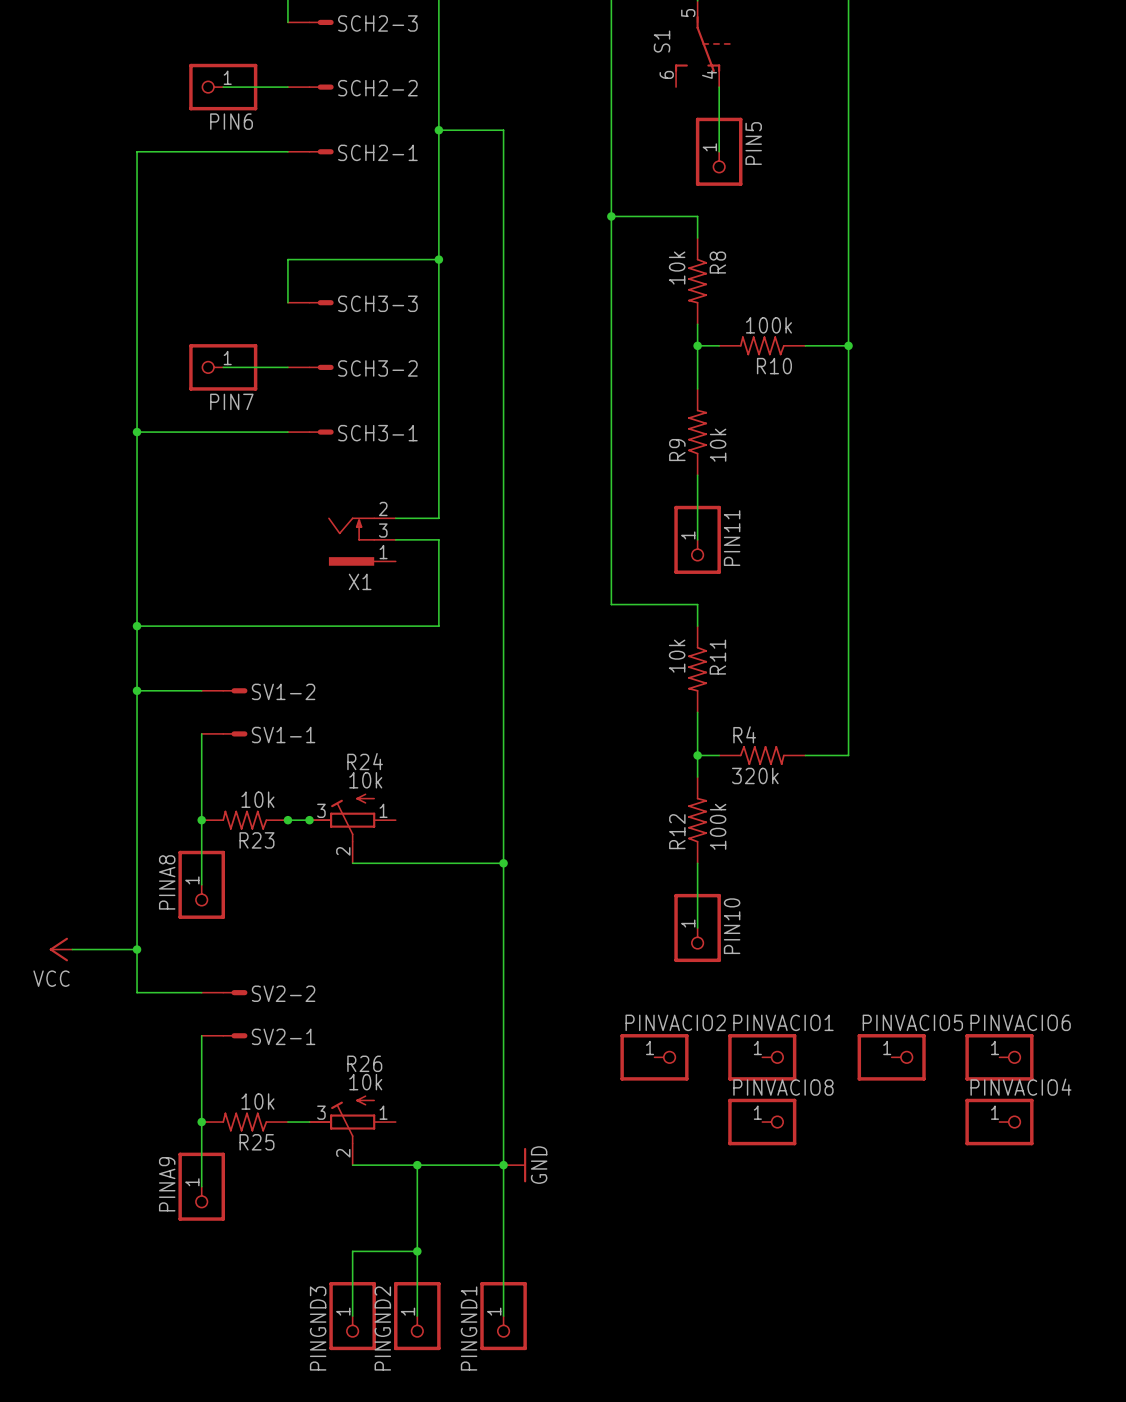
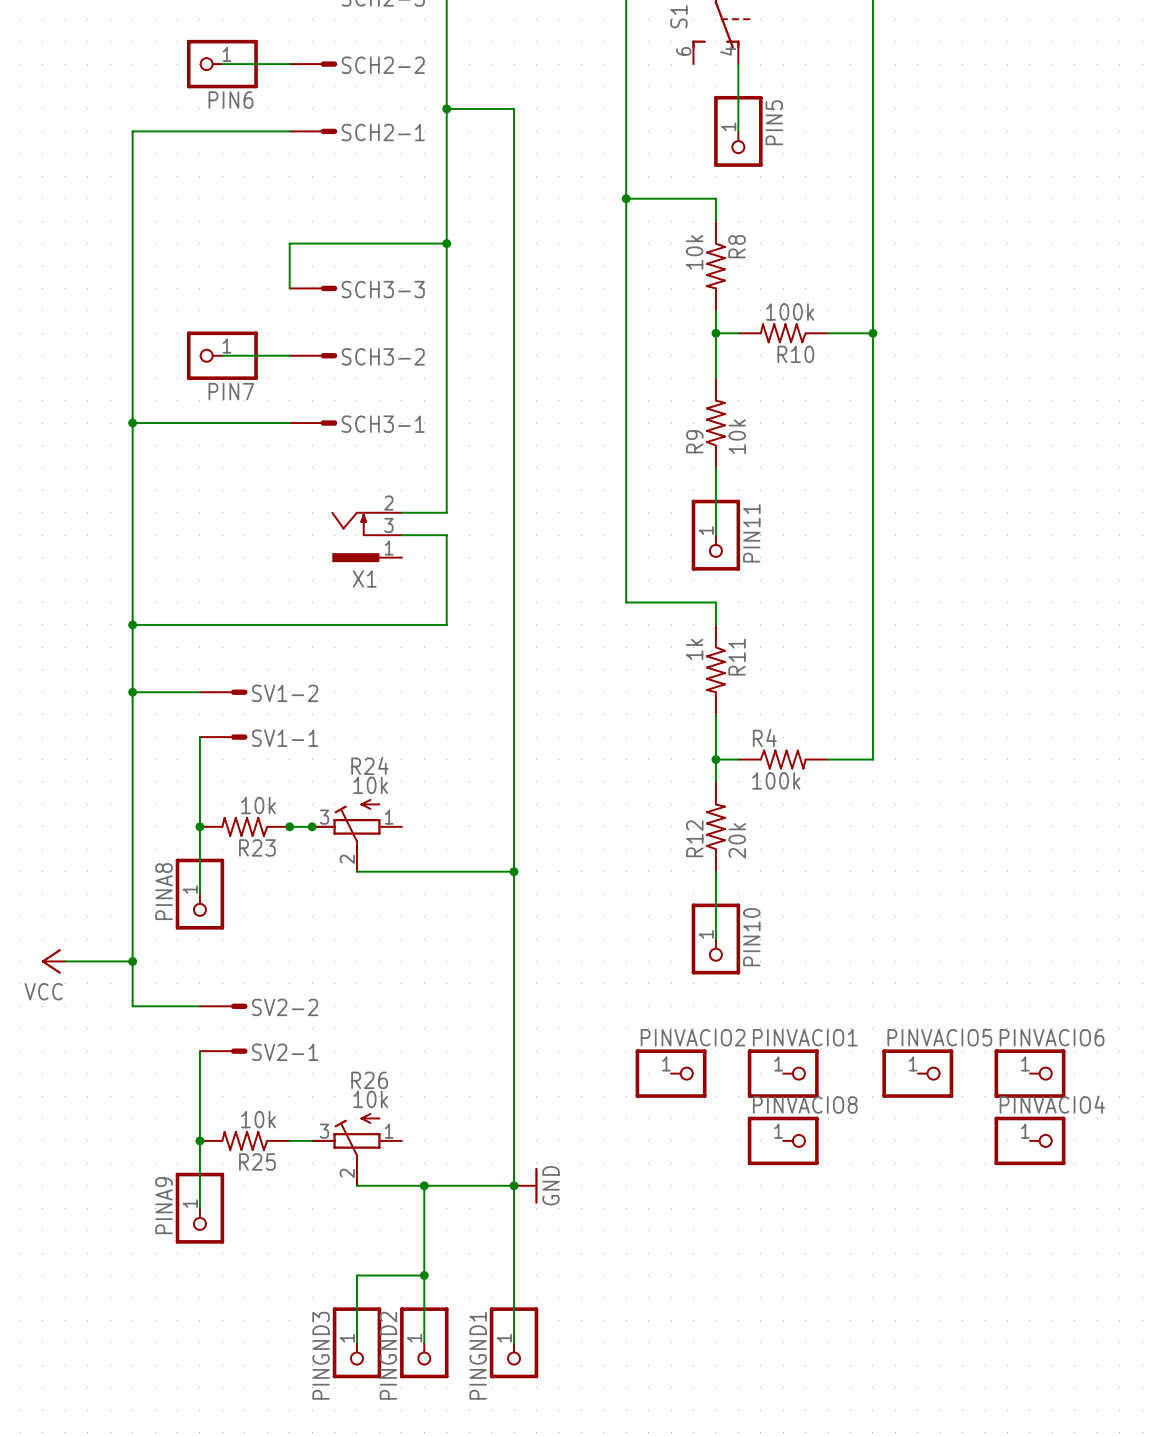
R11 value: 10k (677, 656) -> 1k (694, 649)
R4 value: 320k (755, 775) -> 100k (776, 780)
R12 value: 100k (718, 826) -> 20k (737, 840)

